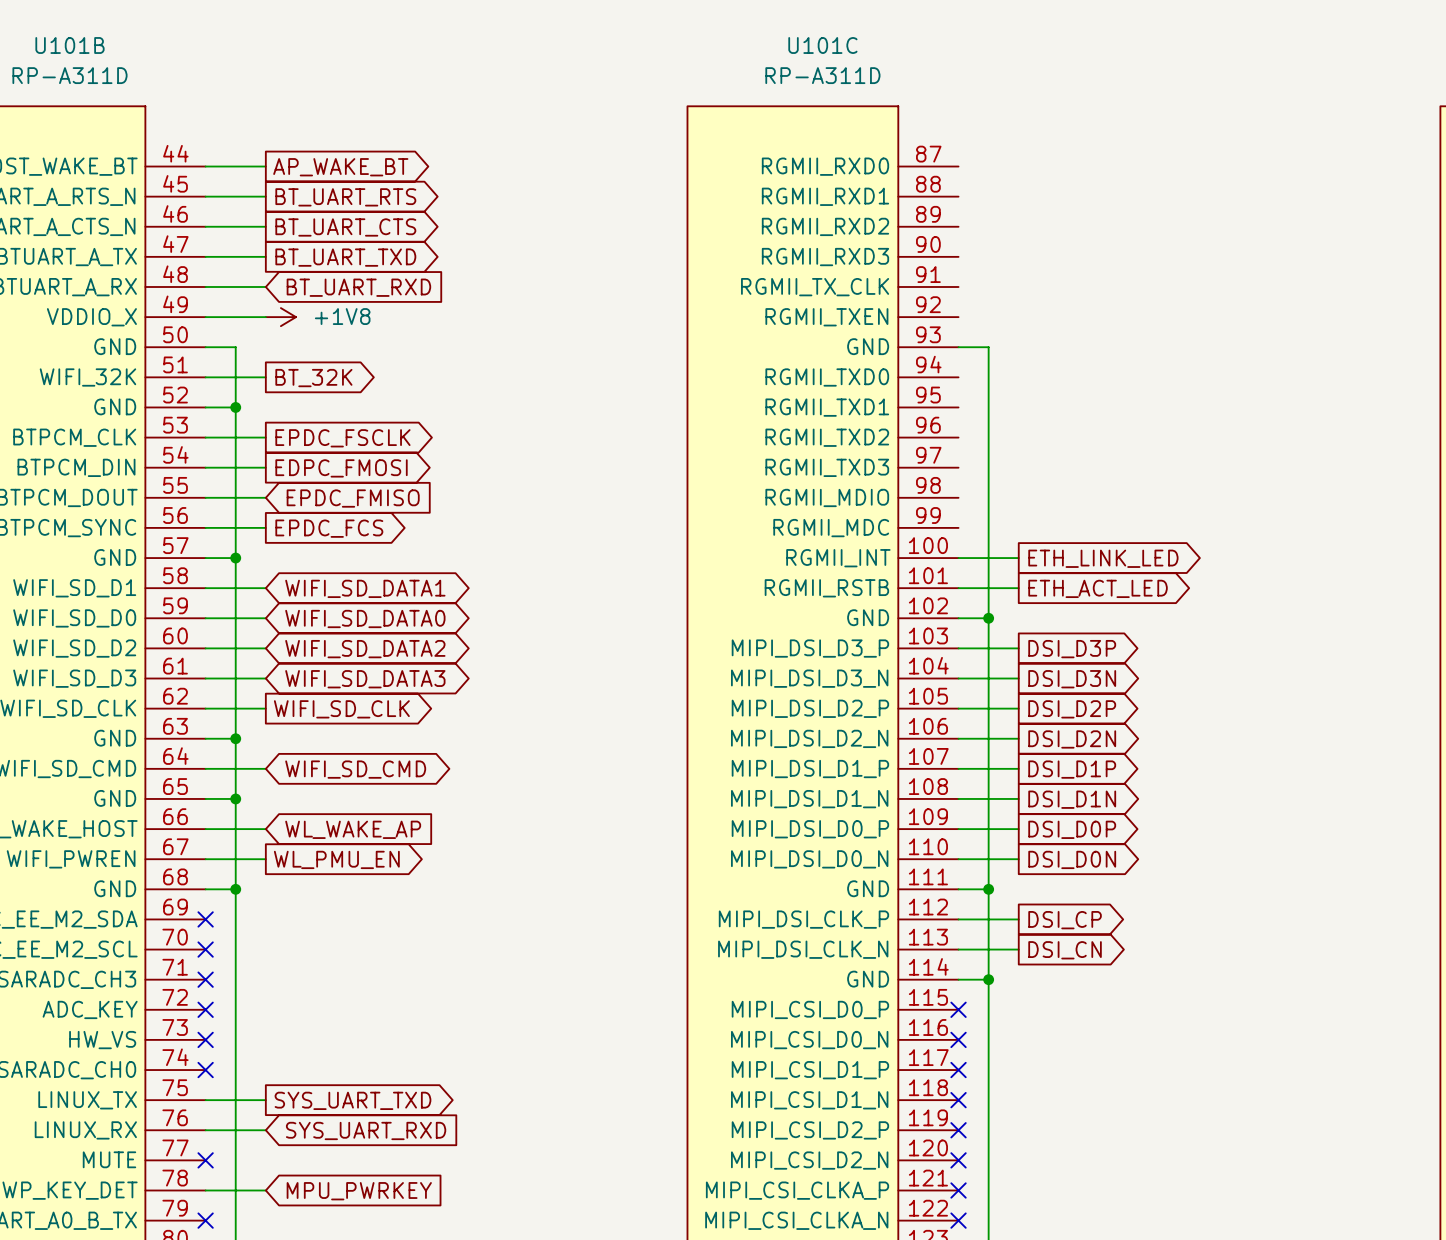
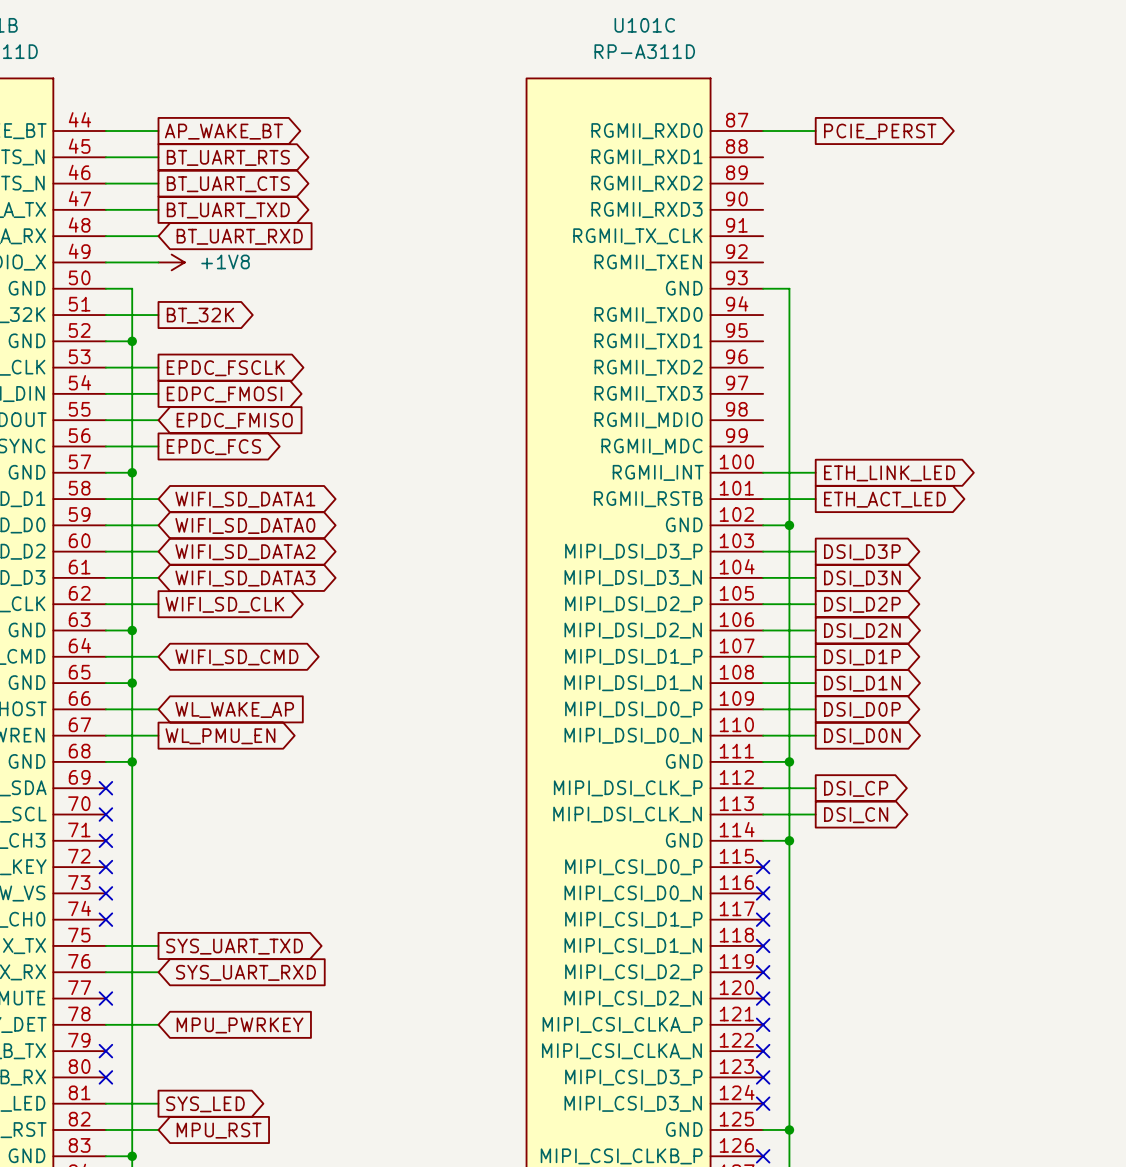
wire: none -> (763, 131) (815, 131)
global label: none -> PCIE_PERST (880, 131)

